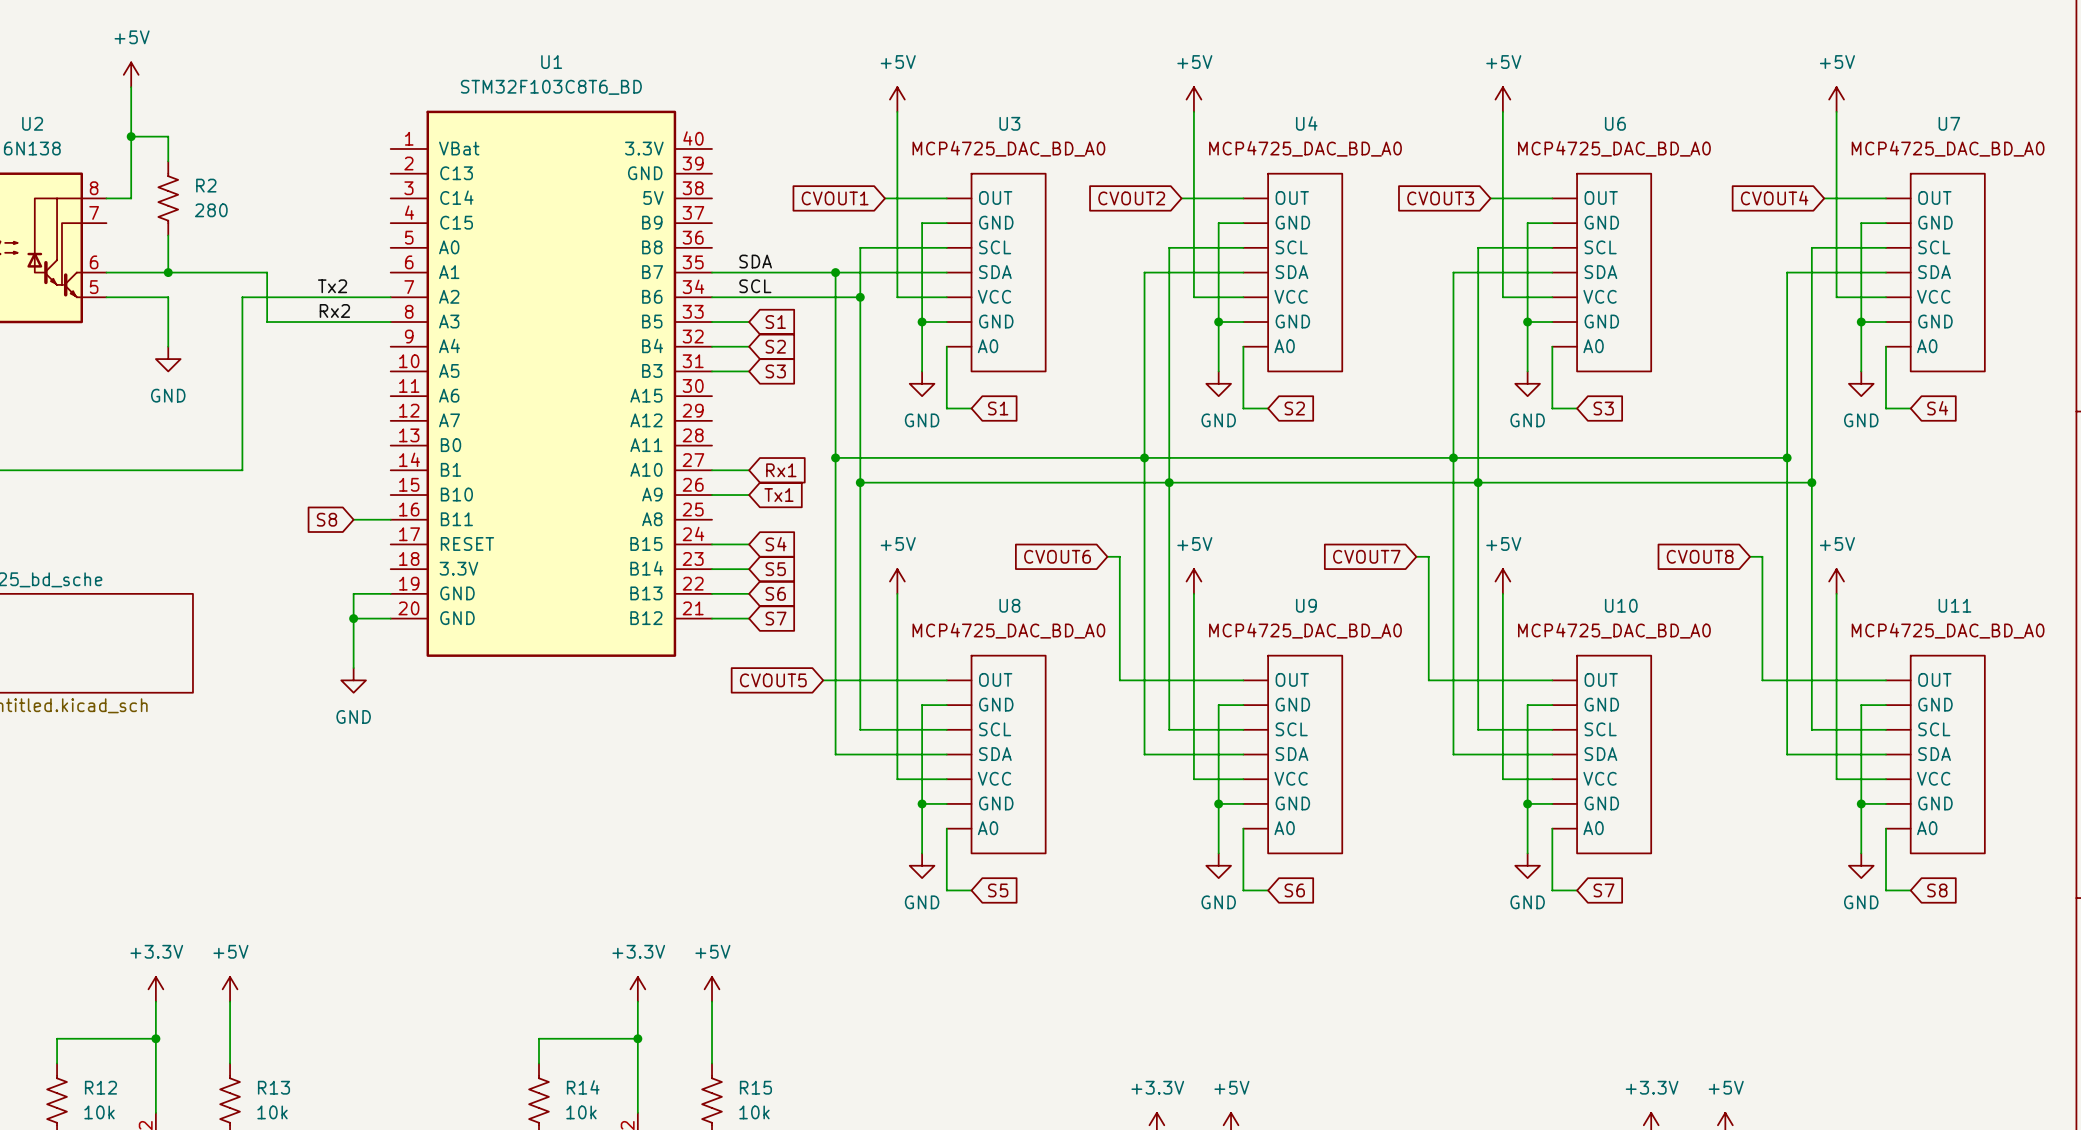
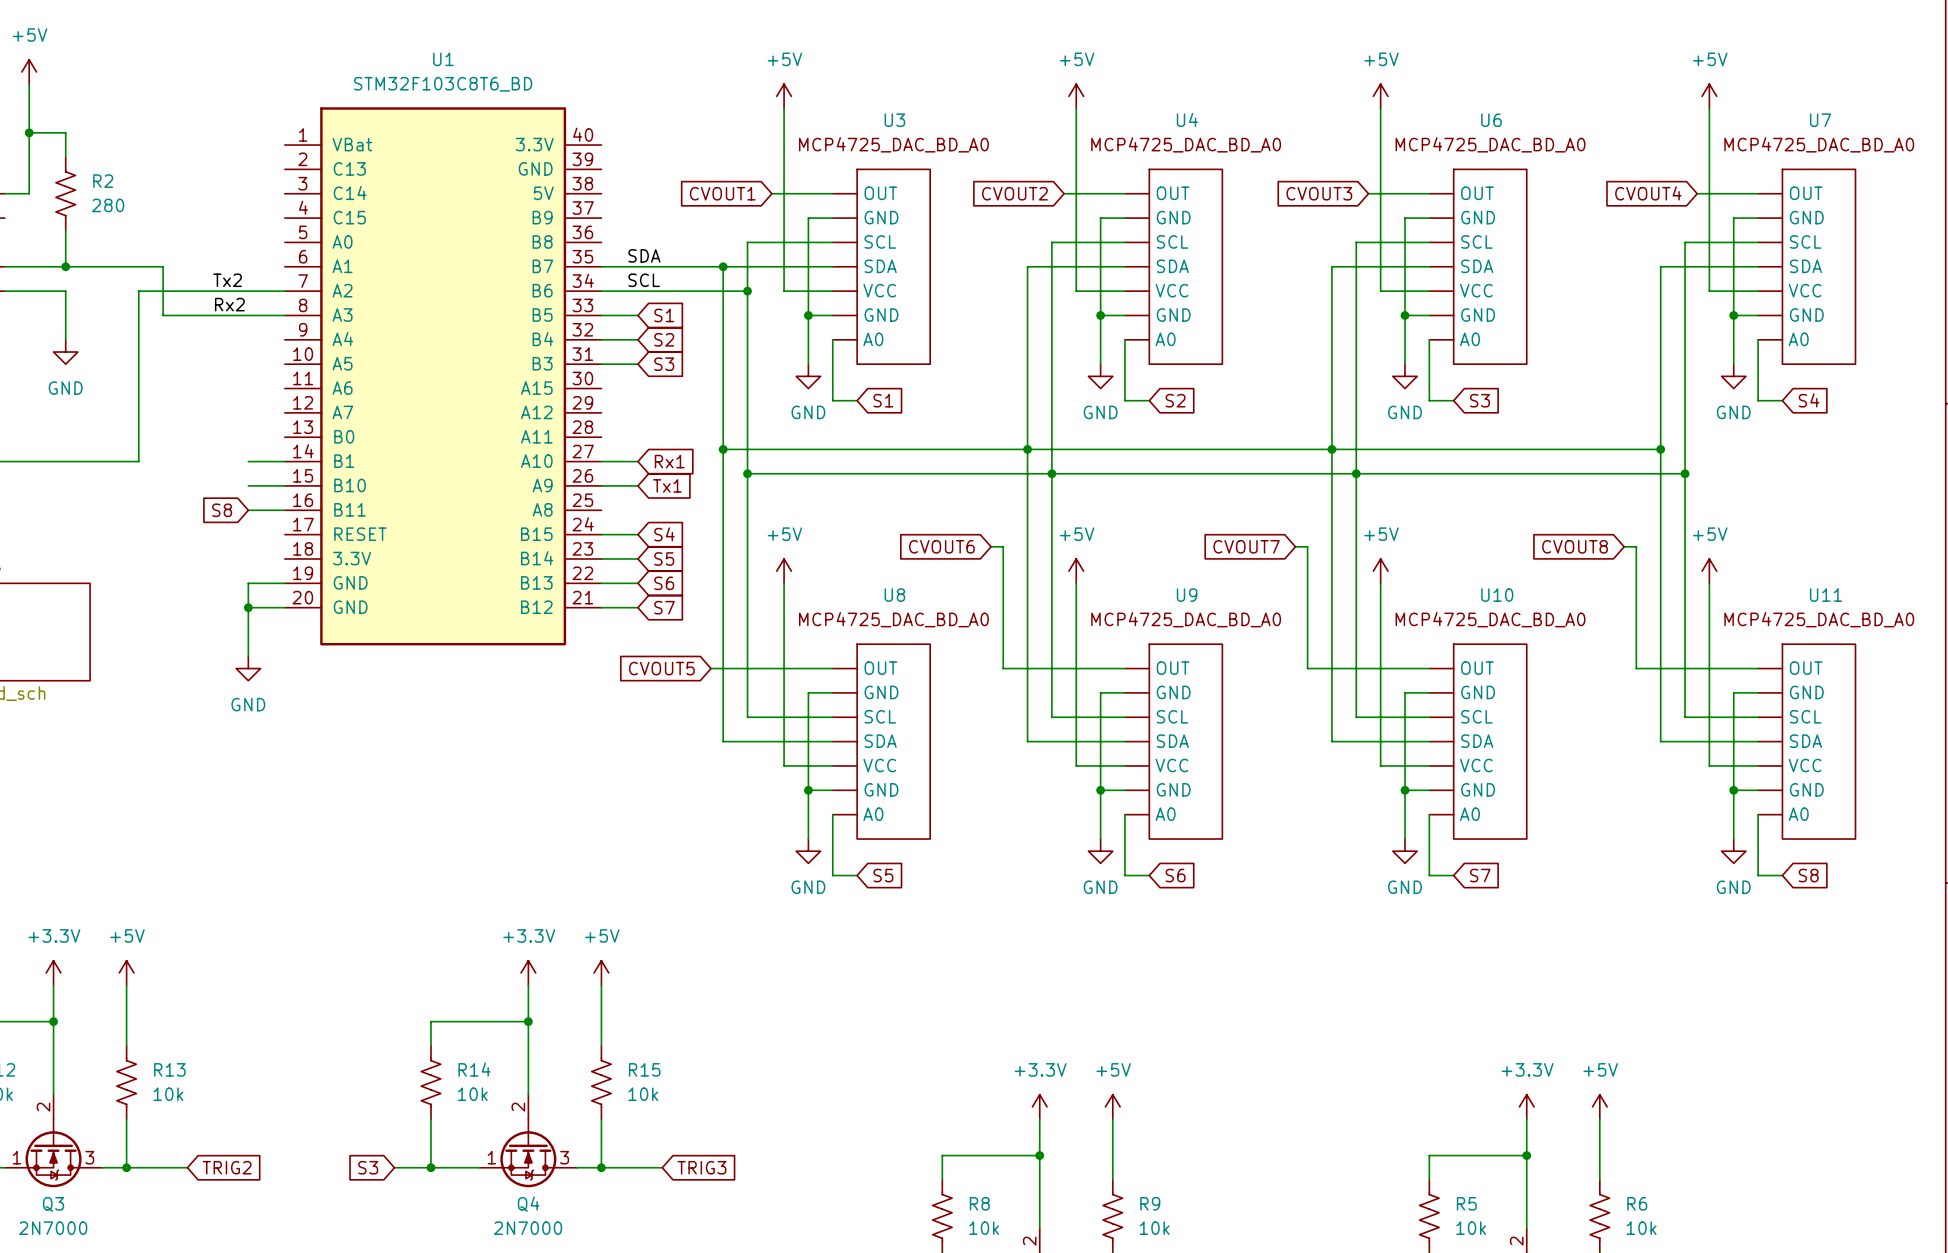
wire: none -> (248, 461) (284, 461)
wire: none -> (248, 485) (284, 485)

